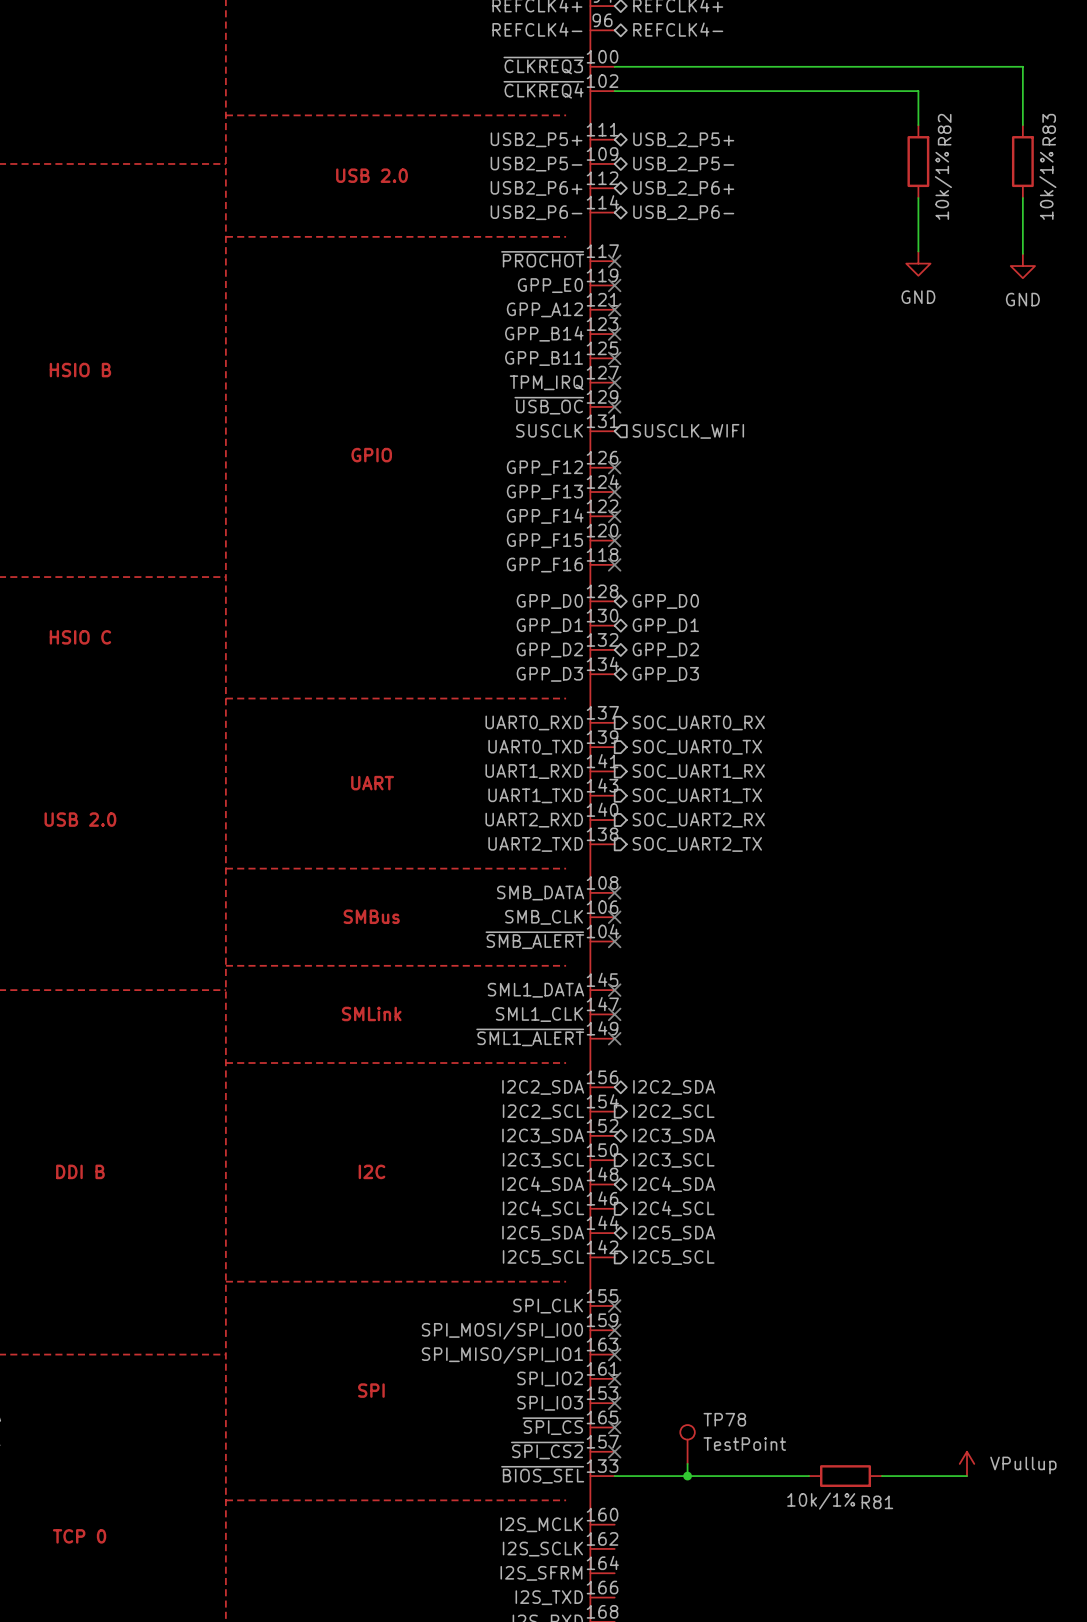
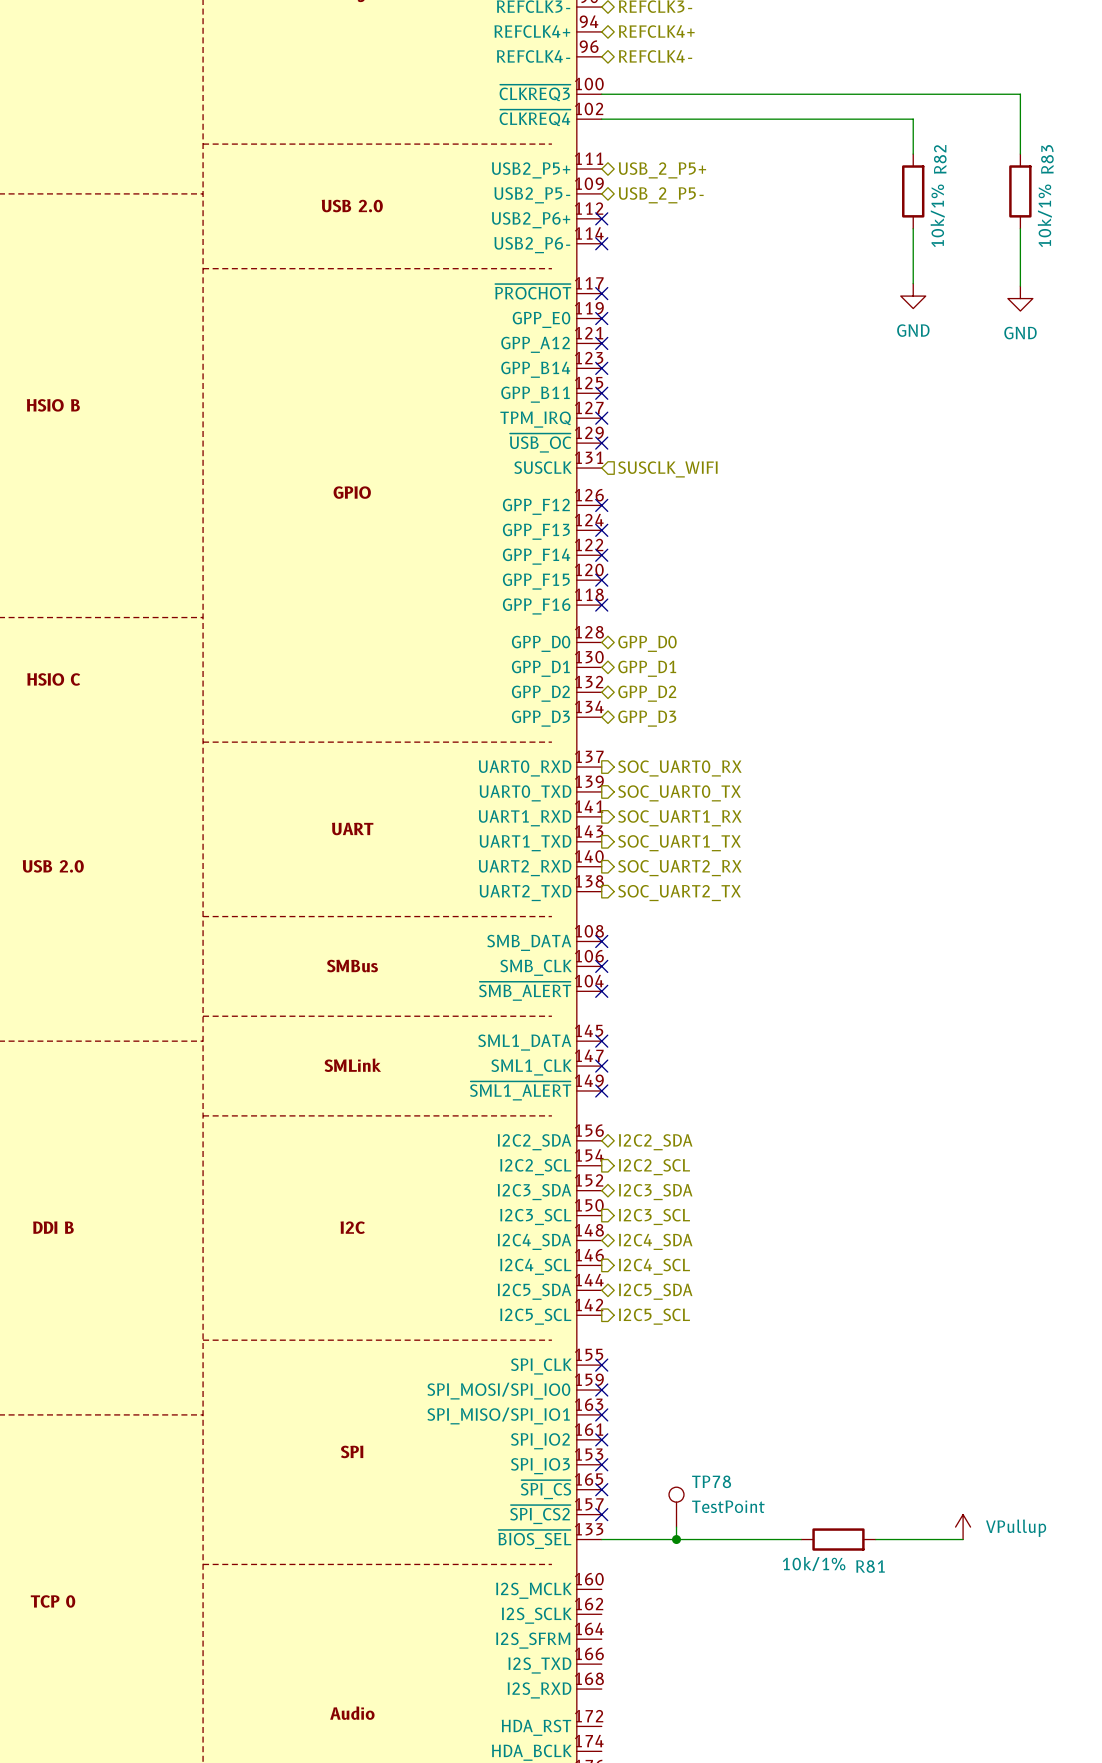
no-connect mark: none -> (601, 218)
hierarchical label: USB_2_P6+ (683, 188) -> none
no-connect mark: none -> (601, 243)
hierarchical label: USB_2_P6- (683, 212) -> none

